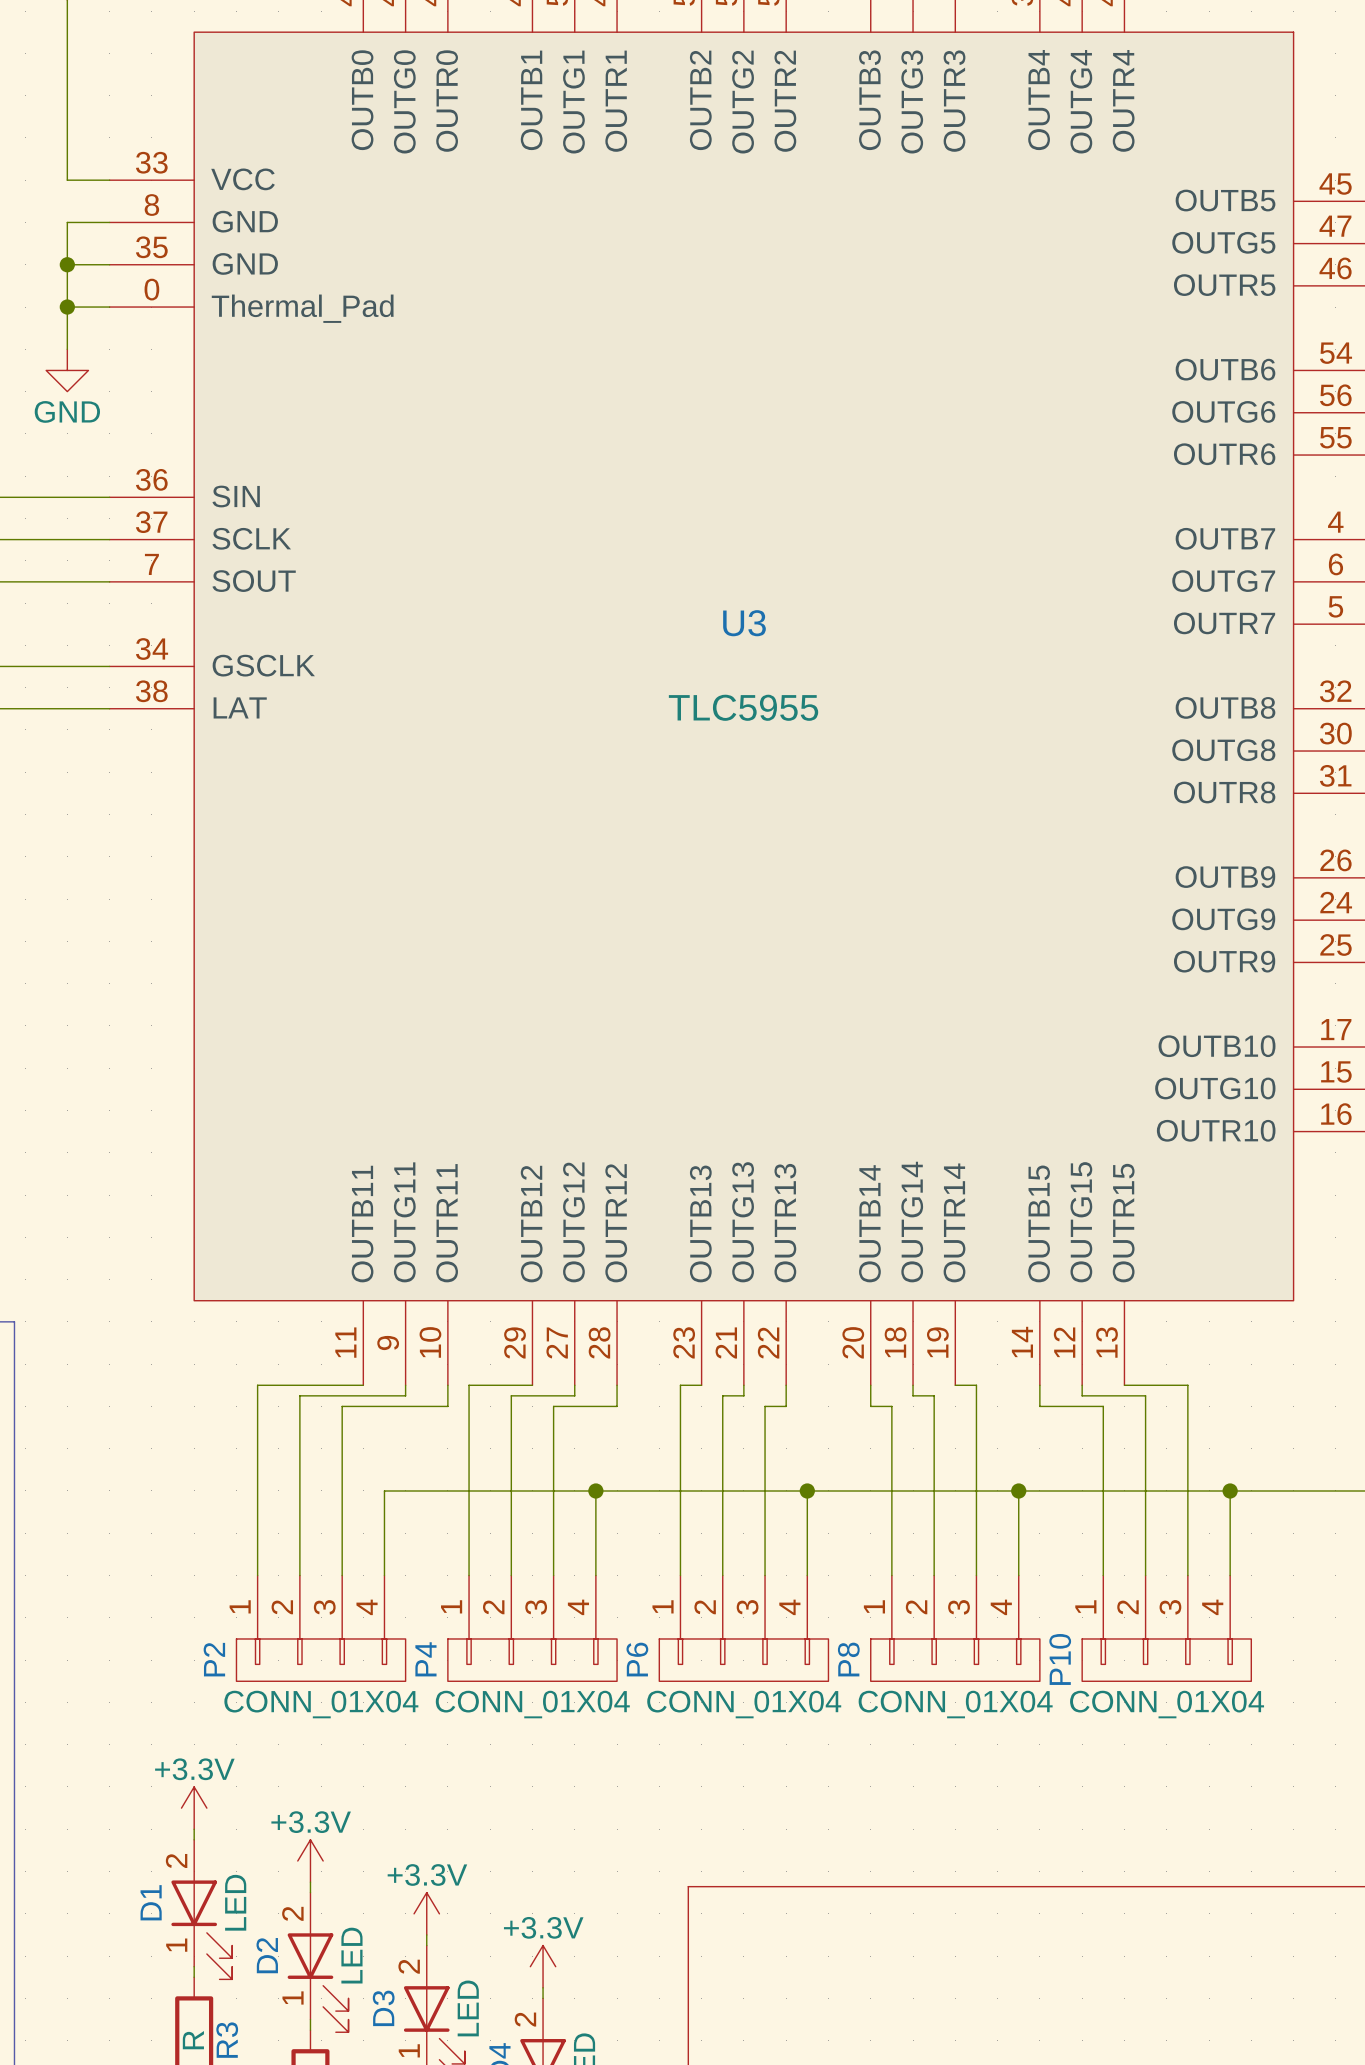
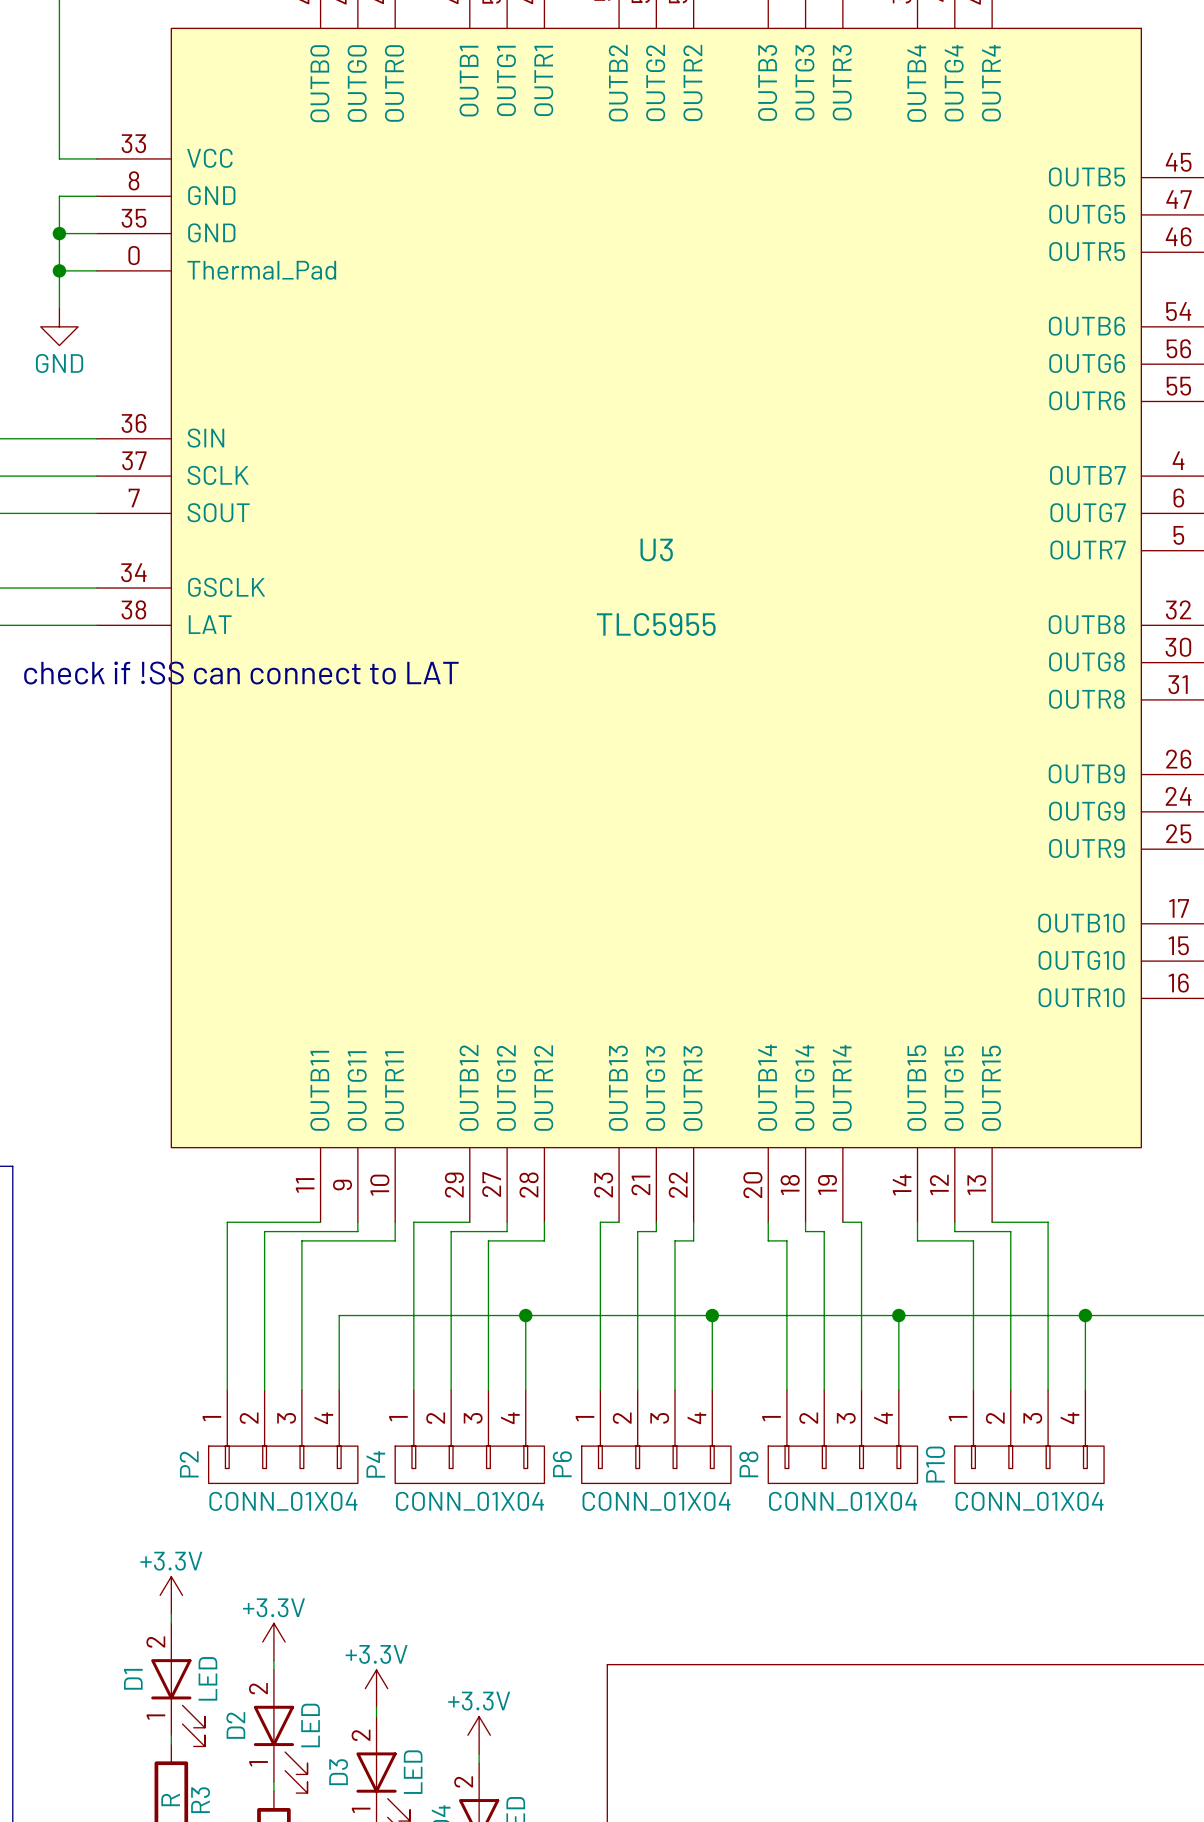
text: none -> check if !SS can connect to LAT (241, 672)

